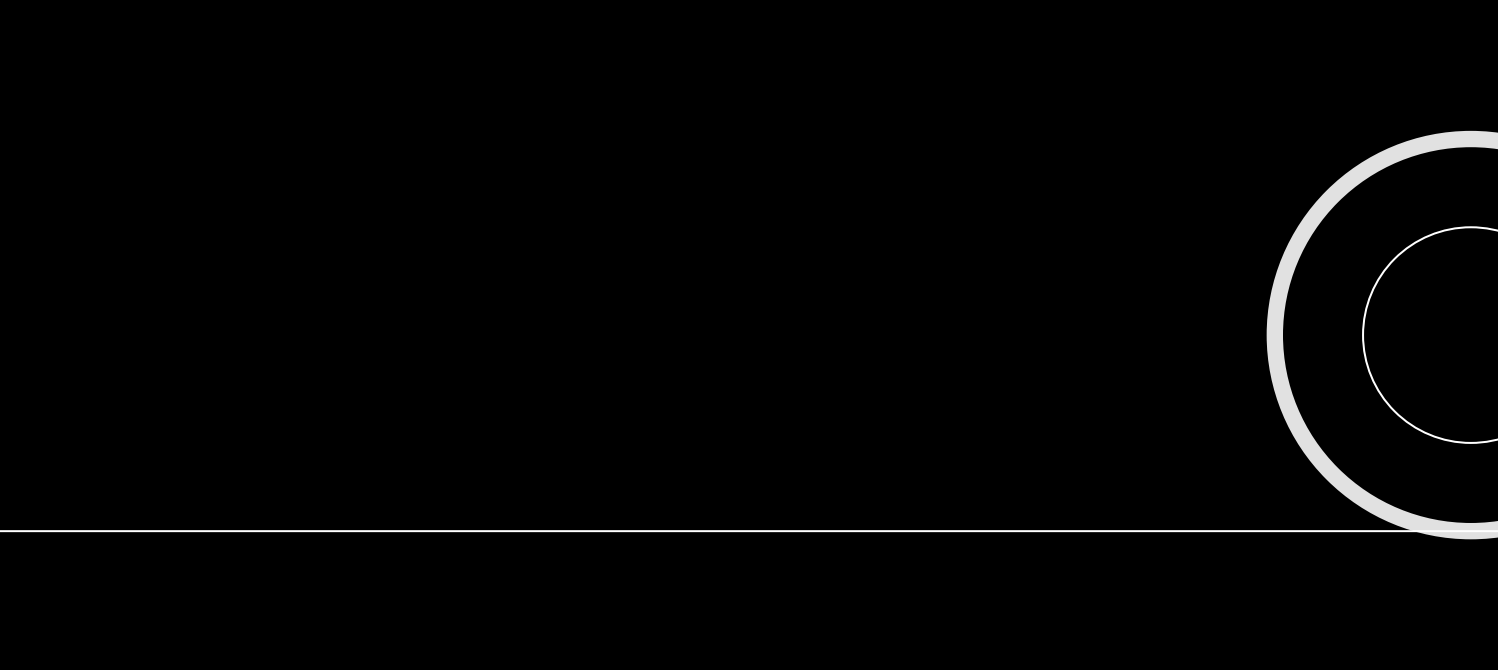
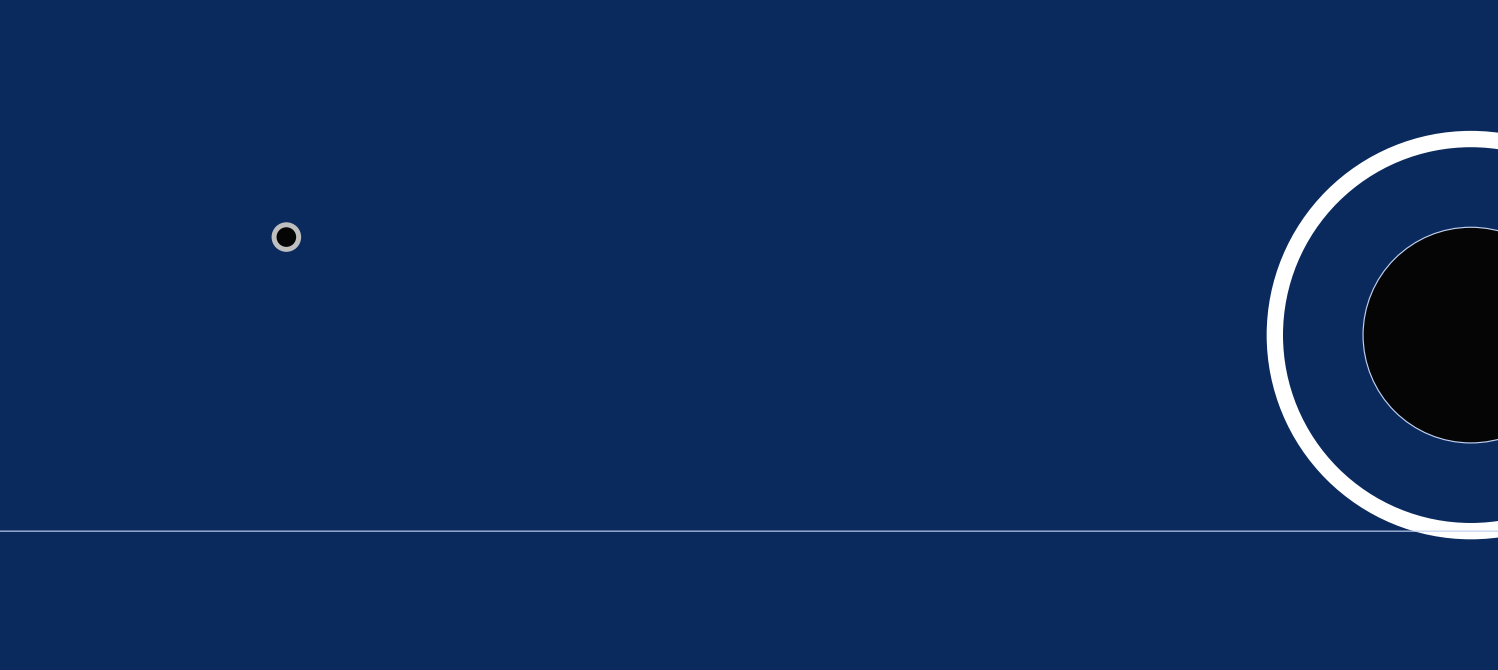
via: none -> (286, 237)

